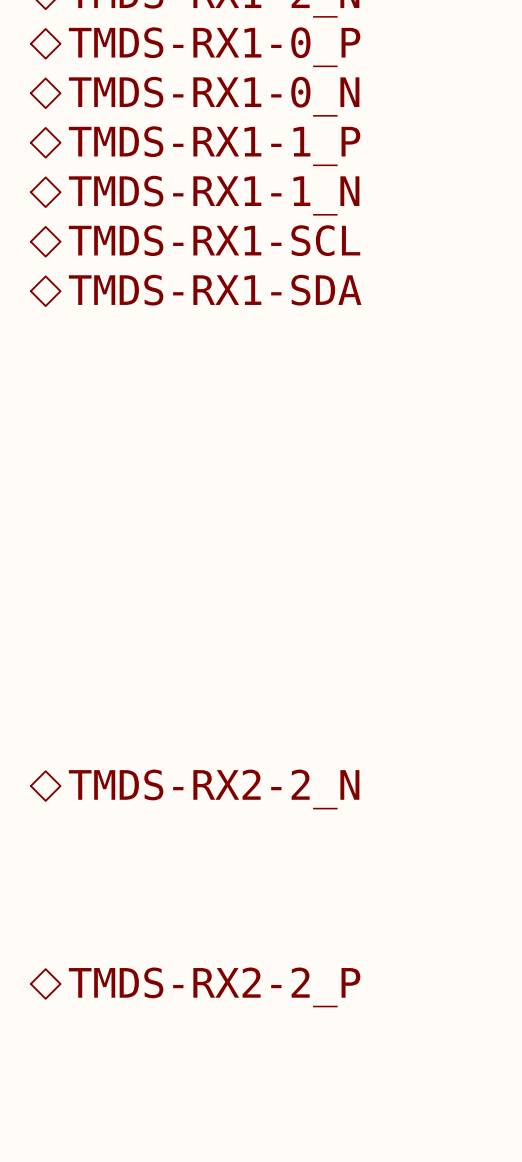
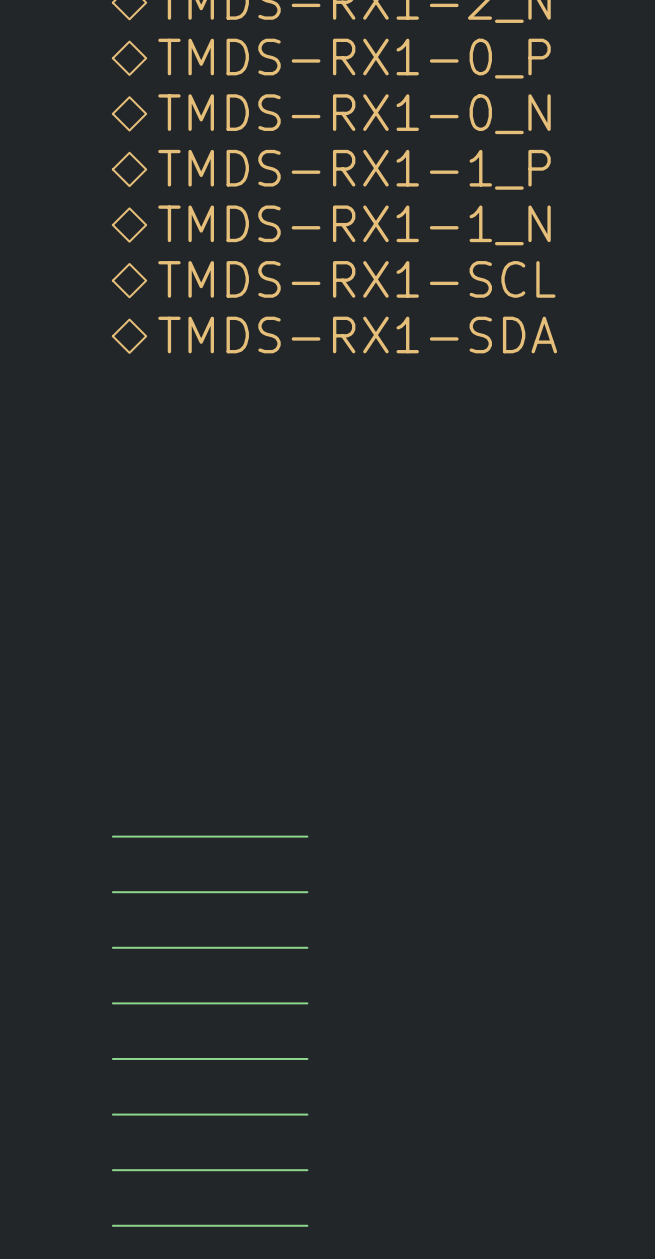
wire: none -> (112, 836) (307, 836)
wire: none -> (112, 892) (307, 892)
hierarchical label: TMDS-RX2-2_N (214, 789) -> none
wire: none -> (112, 947) (307, 947)
wire: none -> (112, 1003) (307, 1003)
wire: none -> (112, 1058) (307, 1058)
wire: none -> (112, 1114) (307, 1114)
hierarchical label: TMDS-RX2-2_P (214, 987) -> none
wire: none -> (112, 1170) (307, 1170)
wire: none -> (112, 1225) (307, 1225)

